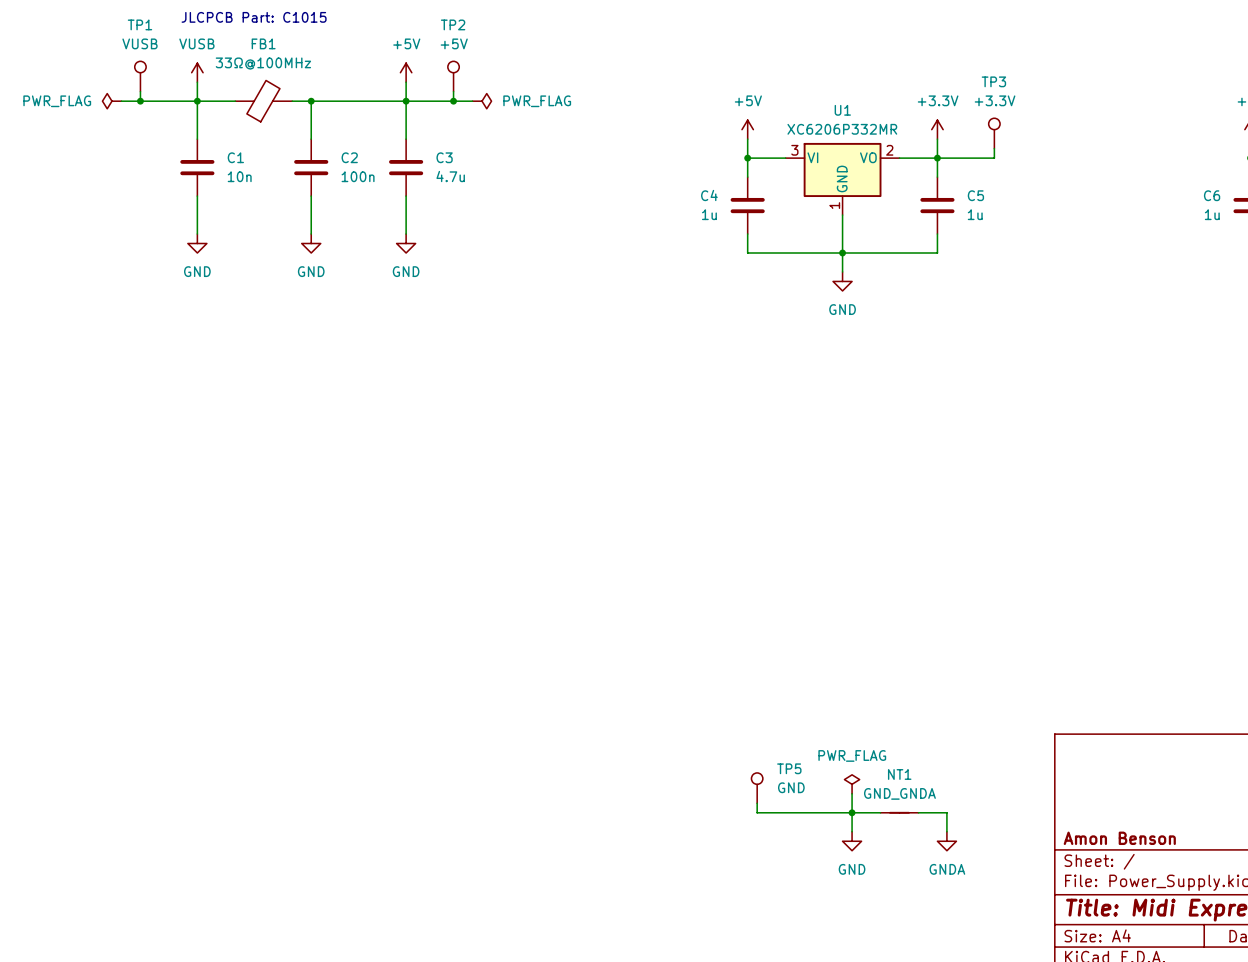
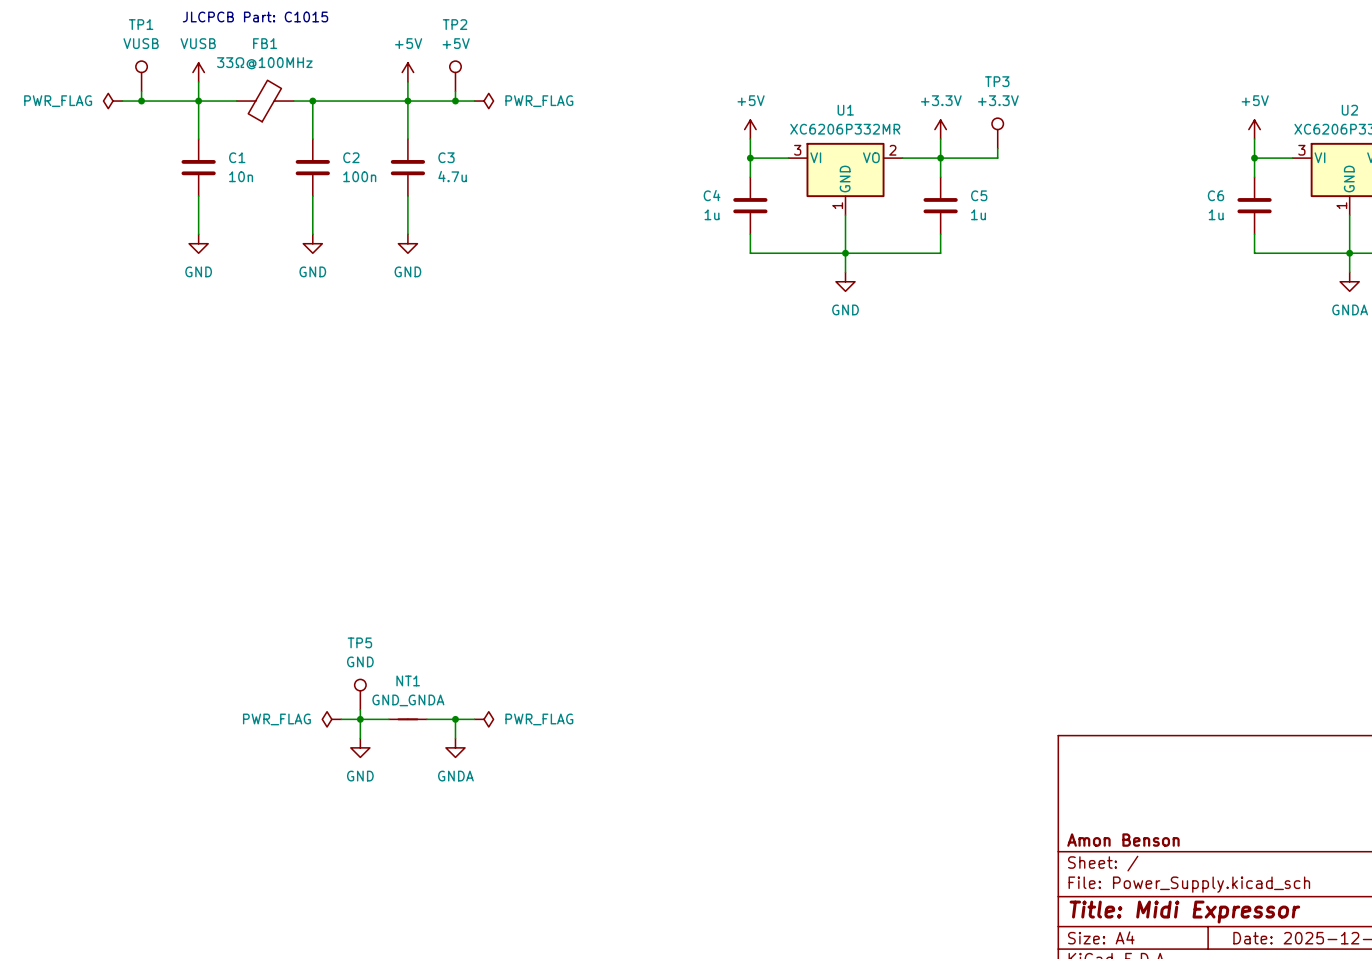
wire: none -> (360, 709) (360, 738)
power symbol: none -> PWR_FLAG (331, 719)
wire: none -> (341, 719) (388, 719)
junction: none -> (360, 719)
wire: none -> (426, 719) (474, 719)
wire: none -> (455, 719) (455, 738)
junction: none -> (455, 719)
power symbol: none -> PWR_FLAG (484, 719)
power symbol: none -> GND (360, 747)
power symbol: none -> GNDA (455, 747)
TP5 name position: TP5 (789, 768) -> TP5 (359, 642)
power symbol: PWR_FLAG (852, 784) -> none
TP5 value position: GND (791, 787) -> GND (360, 661)
TP5 position: (757, 788) -> (360, 694)
wire: (852, 793) (852, 831) -> none
wire: (757, 803) (757, 812) (880, 812) -> none
junction: (852, 812) -> none
NT1 position: (899, 812) -> (407, 719)
wire: (918, 812) (946, 812) (946, 831) -> none
power symbol: GND (852, 841) -> none
power symbol: GNDA (946, 841) -> none

